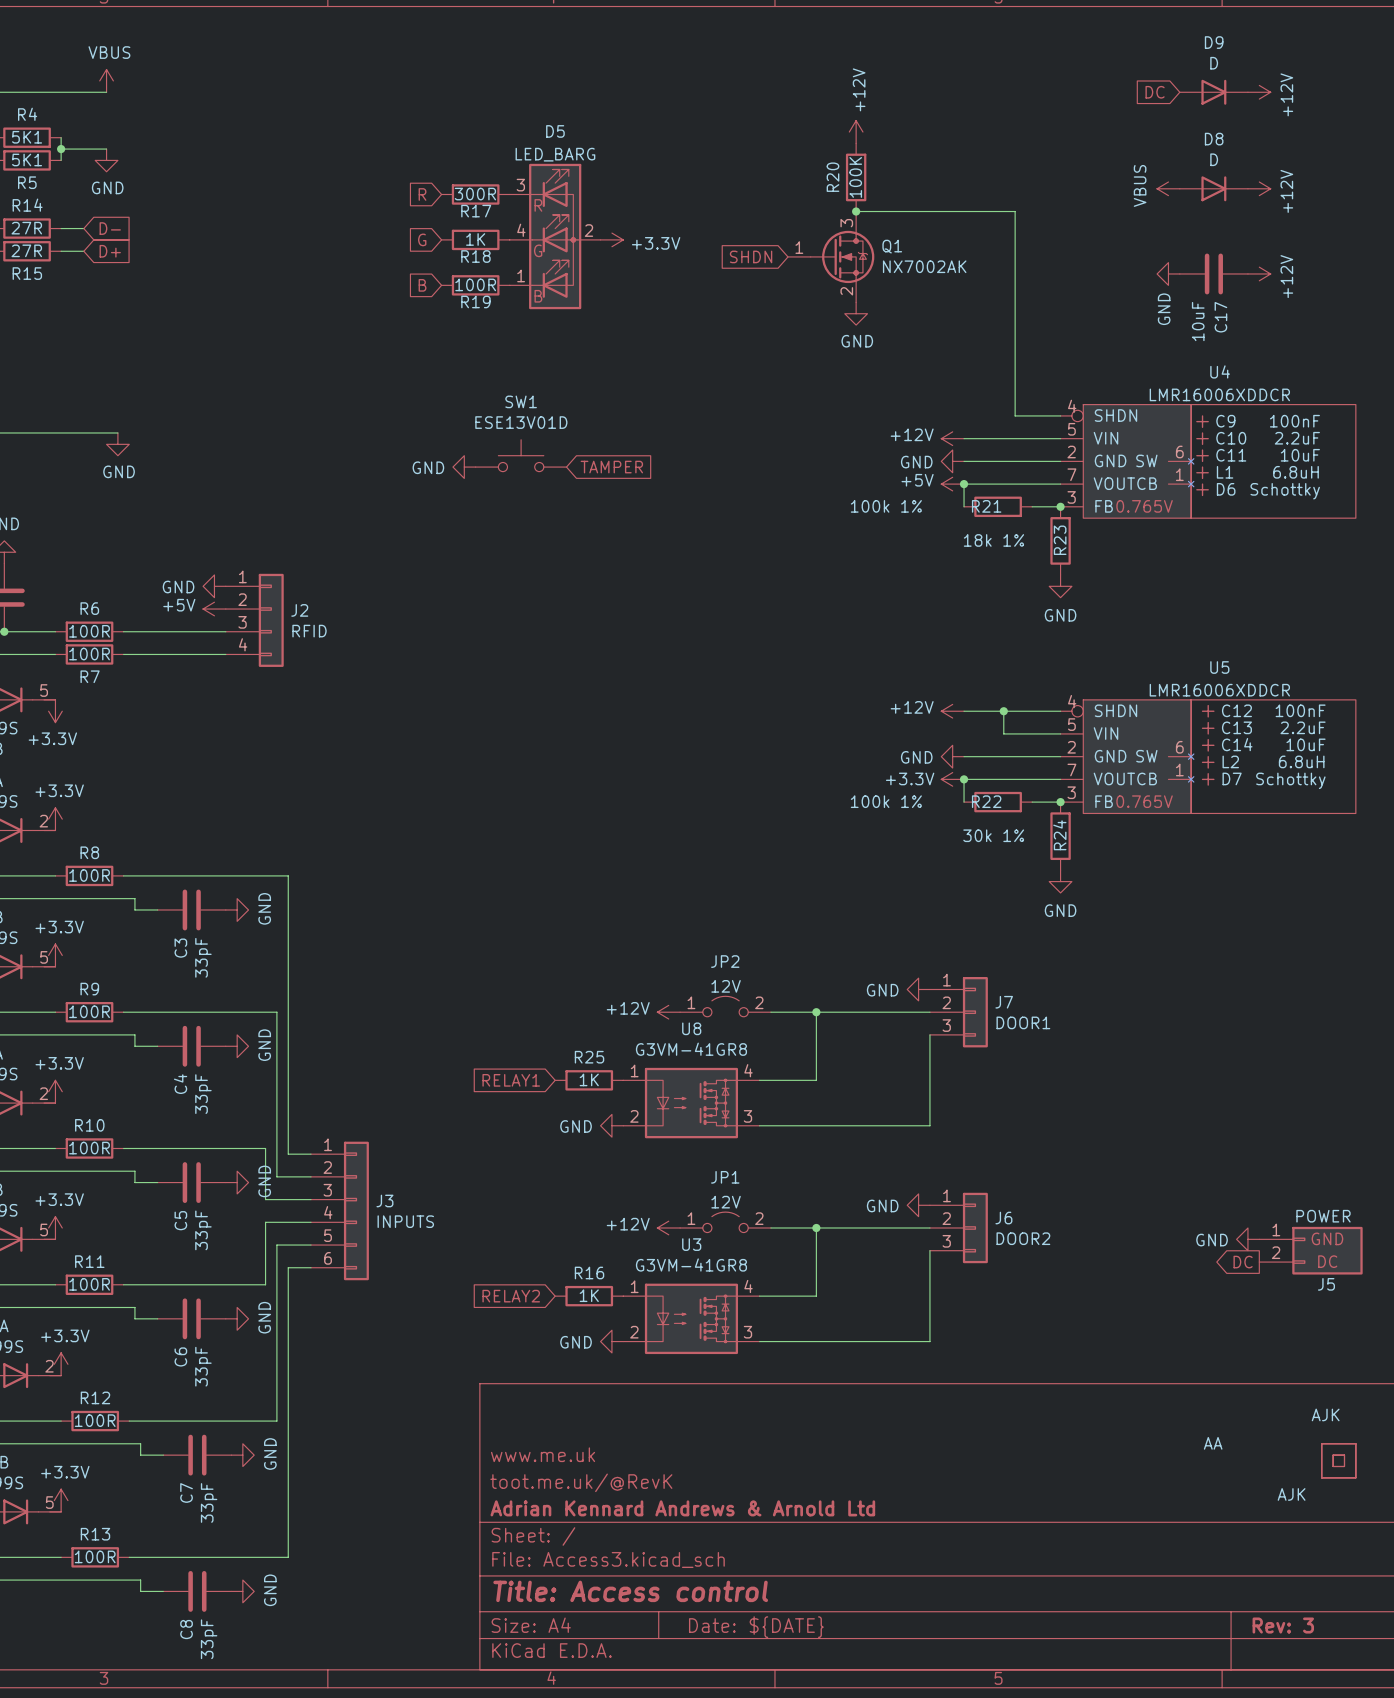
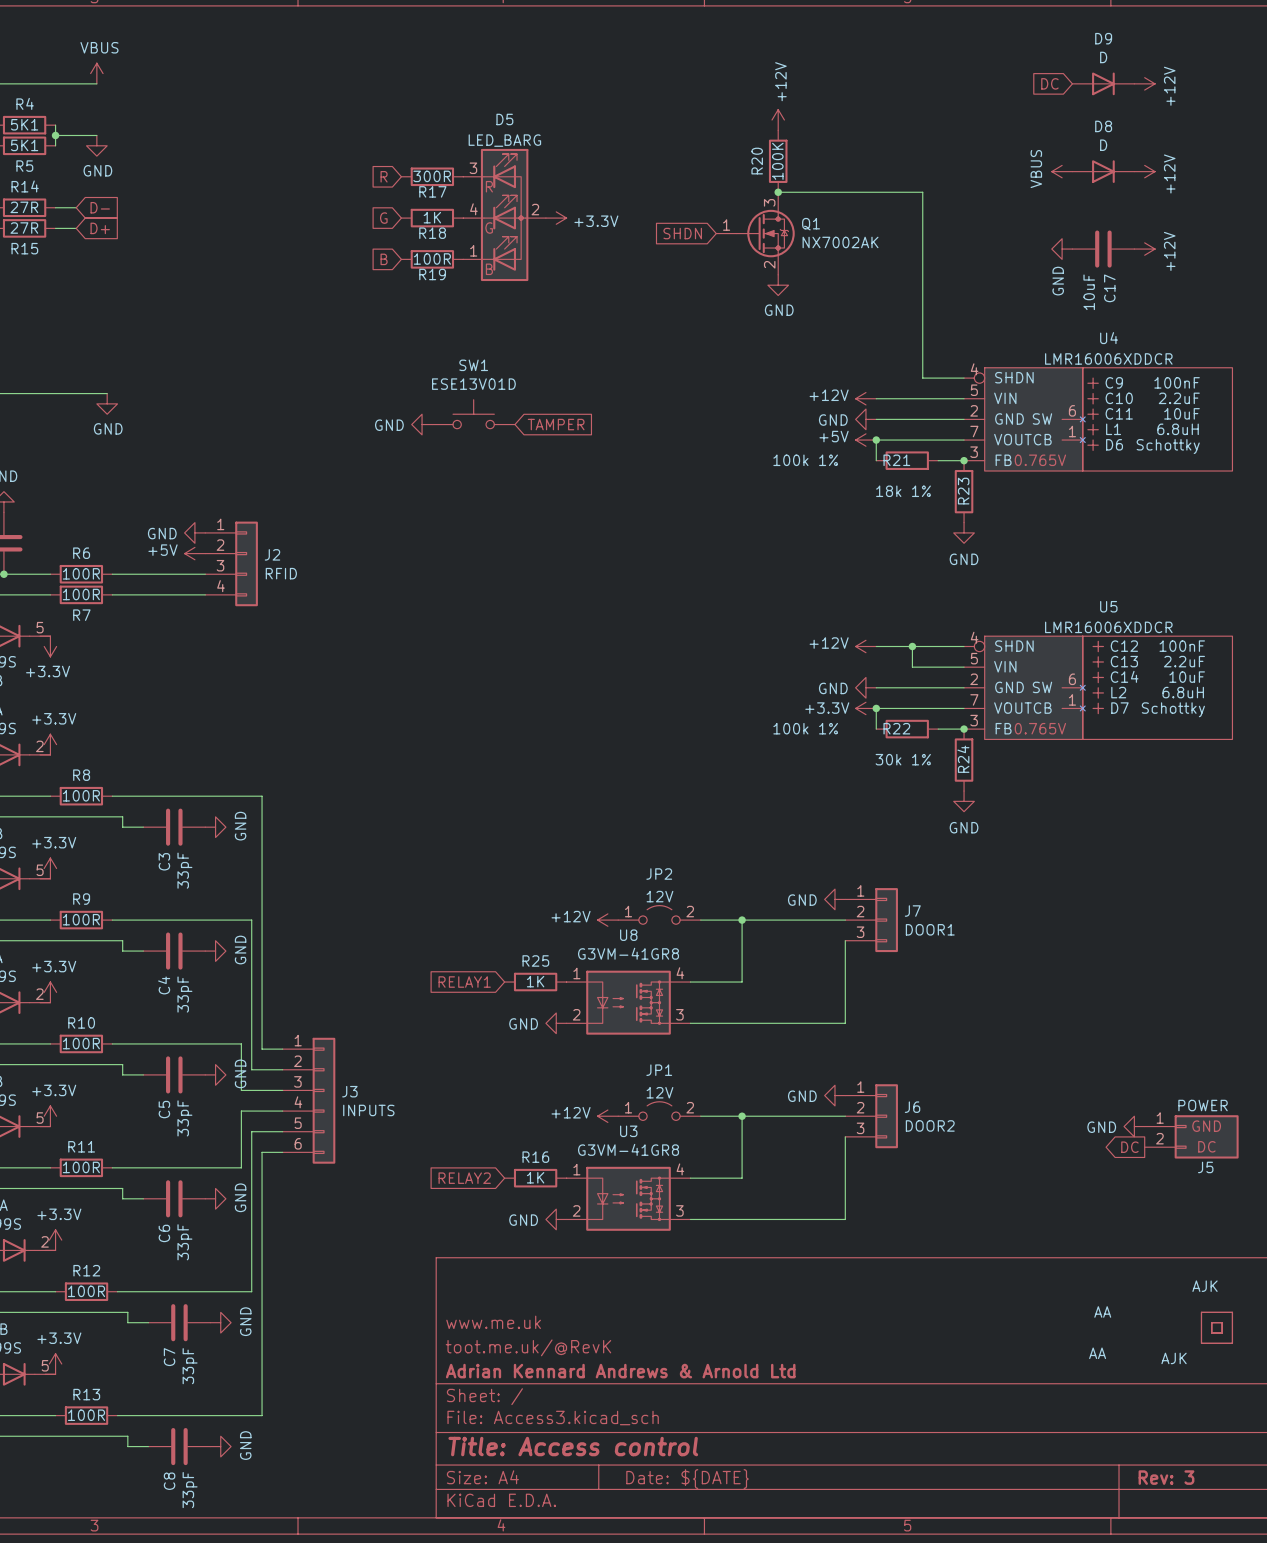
part: none -> AA (1097, 1353)

